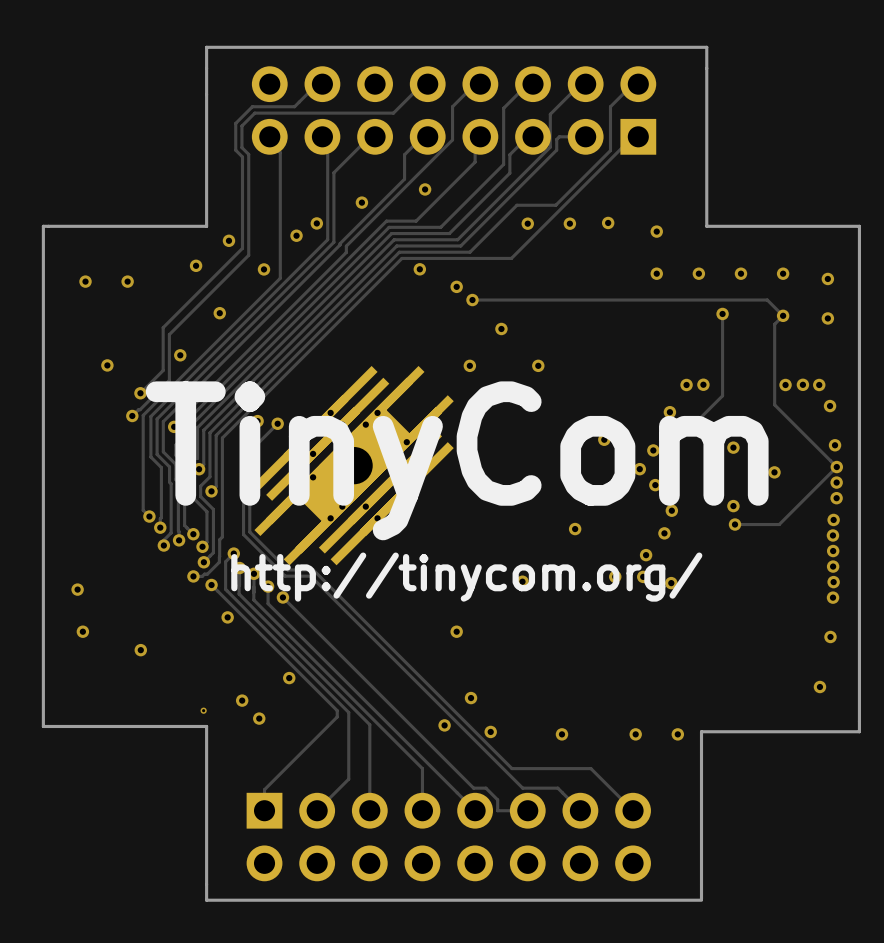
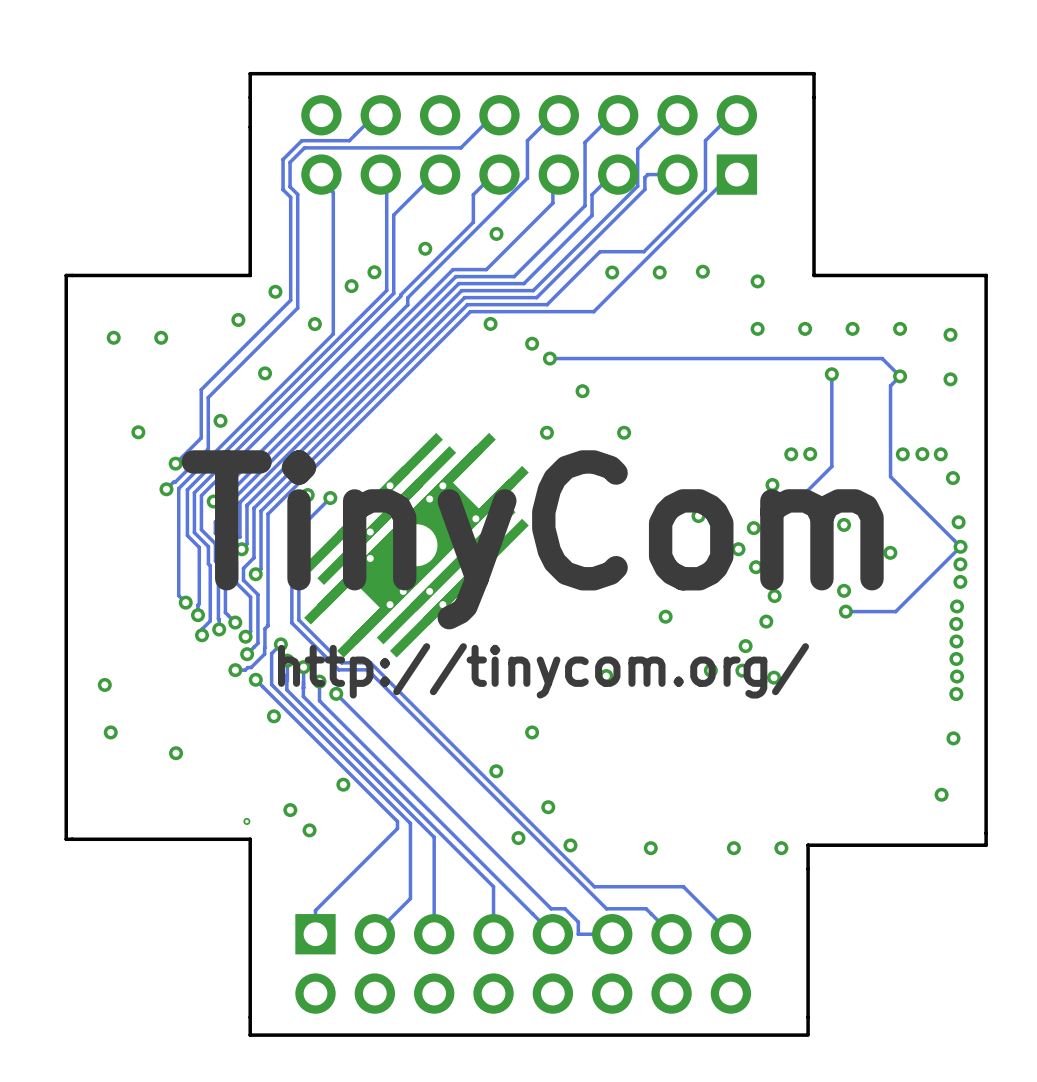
via: none -> (496, 771)

